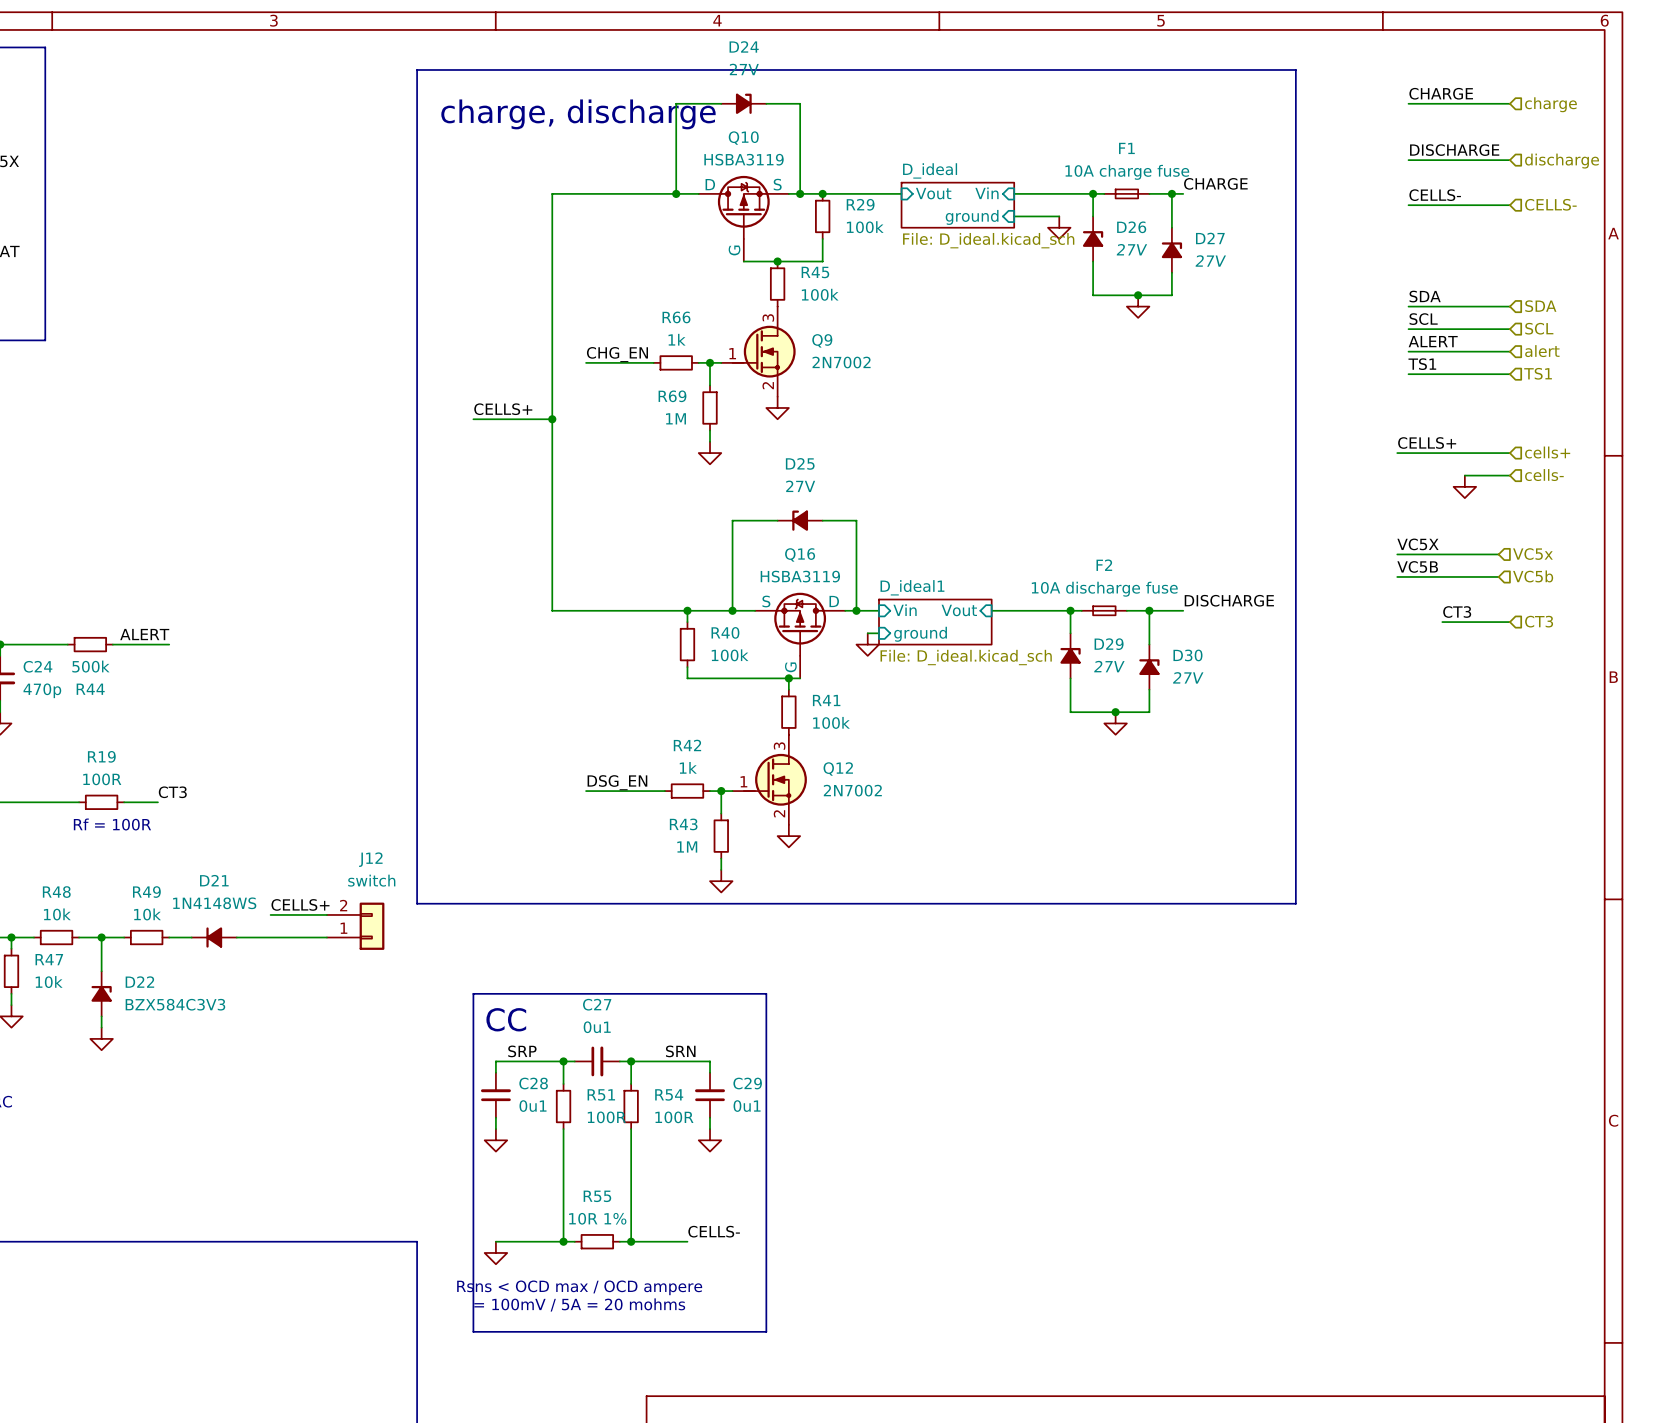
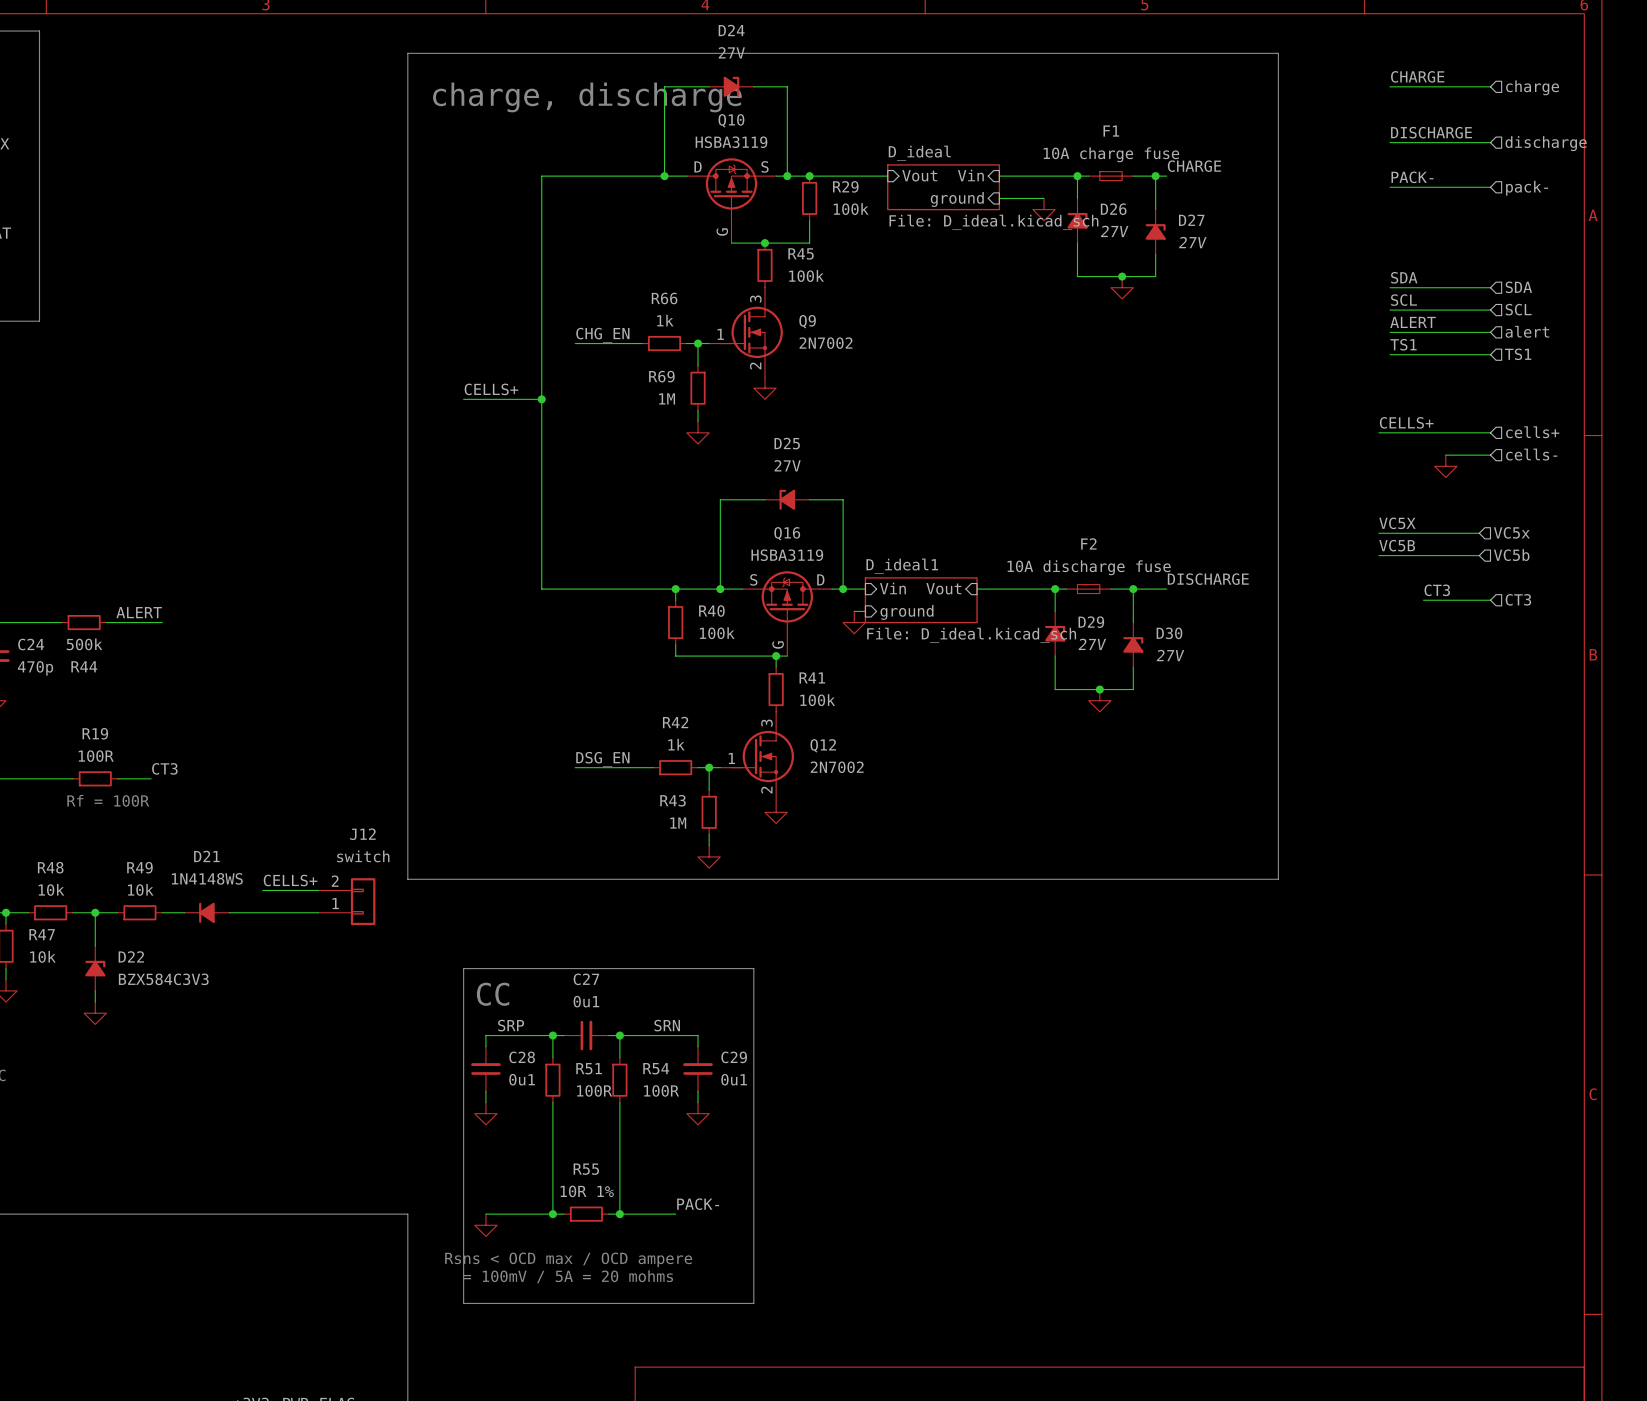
label: CELLS- (1435, 195) -> PACK- (1412, 177)
hierarchical label: CELLS- (1550, 204) -> pack- (1527, 188)
label: CELLS- (714, 1231) -> PACK- (698, 1204)

